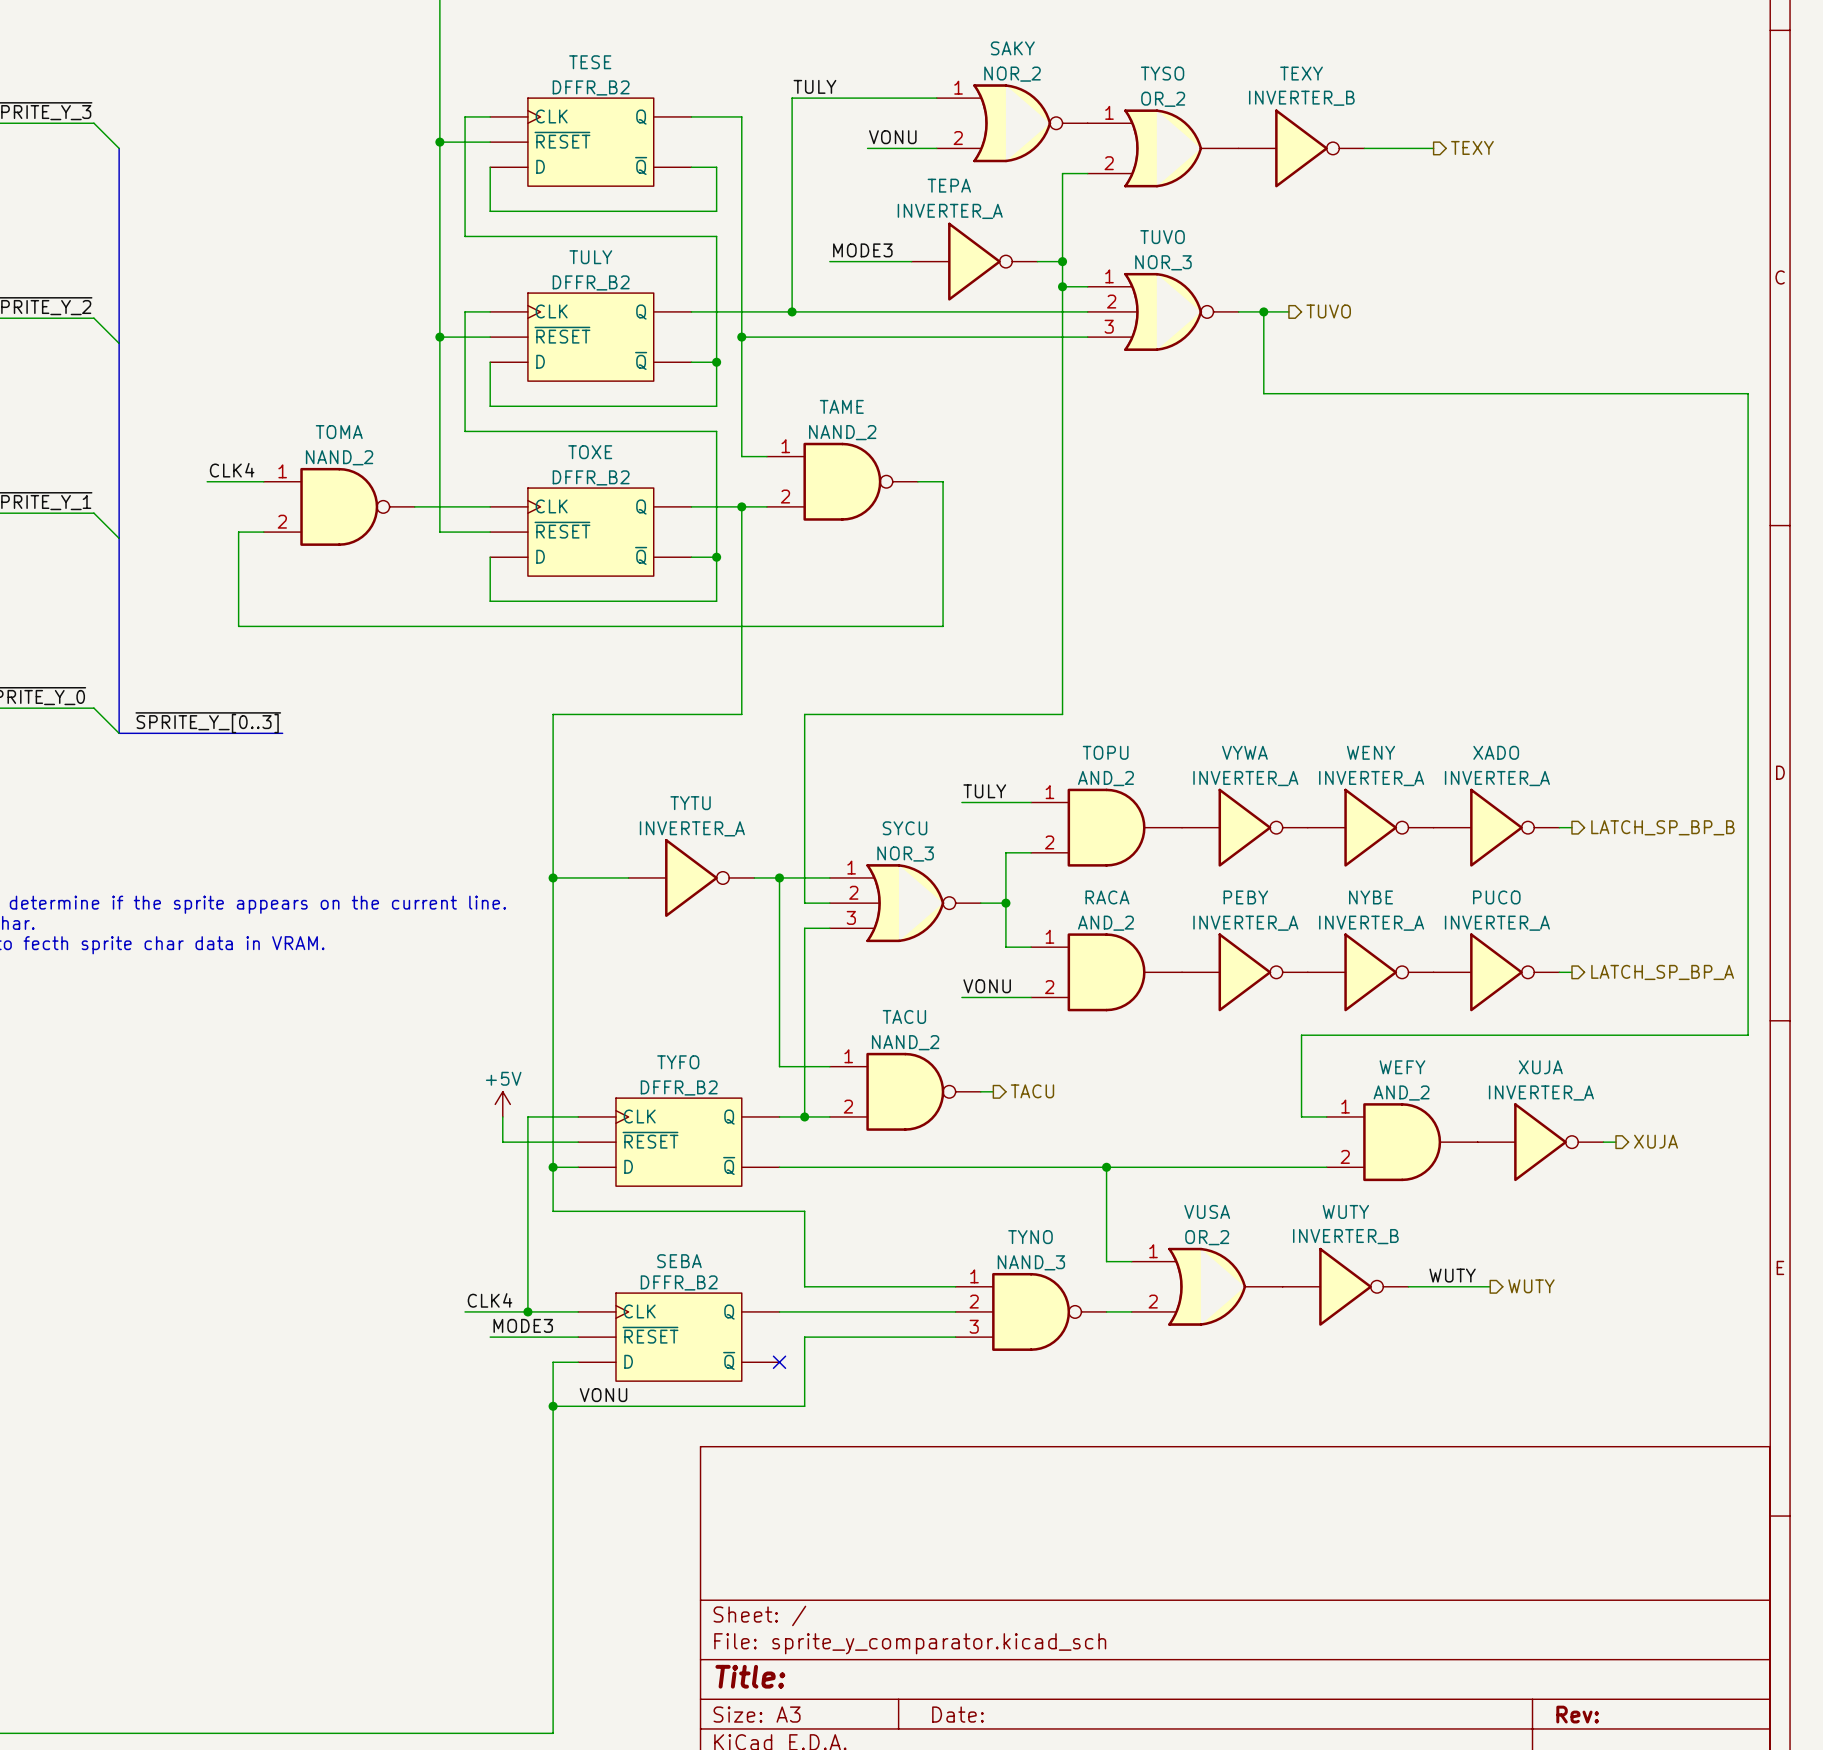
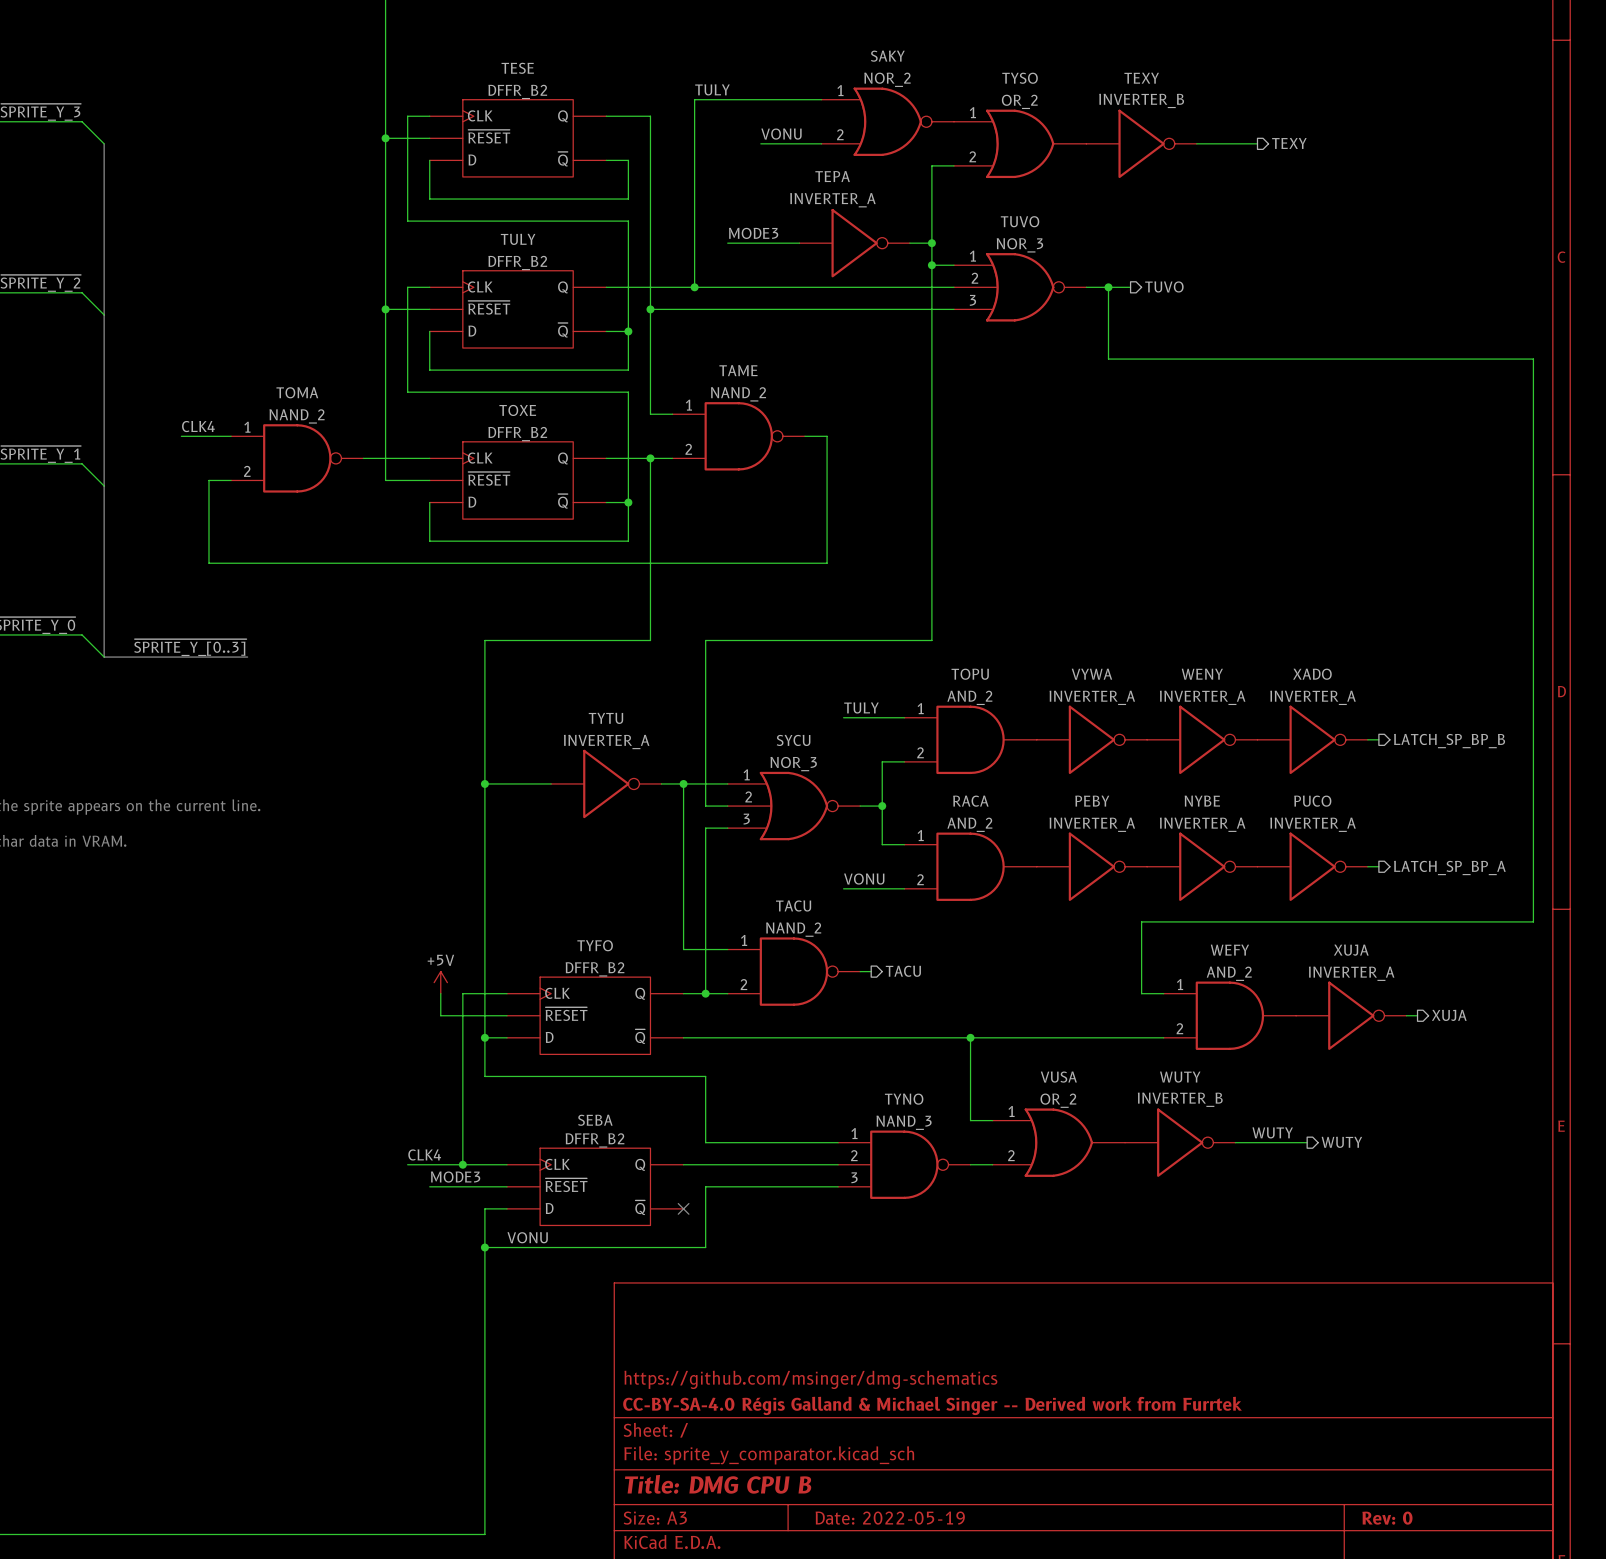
title block: none -> https://github.com/msinger/dmg-schematics (810, 1379)
title block: none -> CC-BY-SA-4.0 Régis Galland & Michael Singer -- Derived work from Furrtek (932, 1405)
title block: Title: (750, 1676) -> Title: DMG CPU B (718, 1484)
title block: Date: (957, 1714) -> Date: 2022-05-19 (890, 1518)
title block: Rev: (1577, 1714) -> Rev: 0 (1387, 1518)

